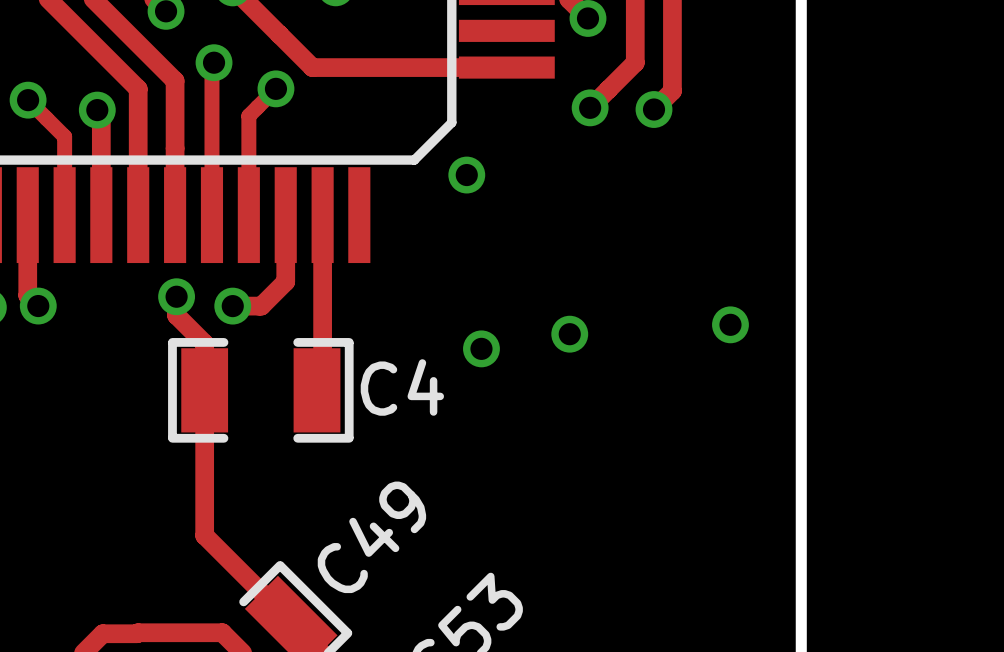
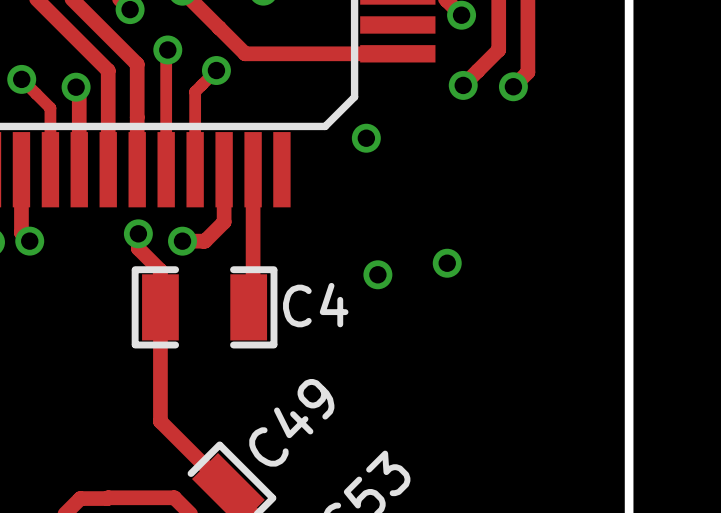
via: (730, 324) -> none

